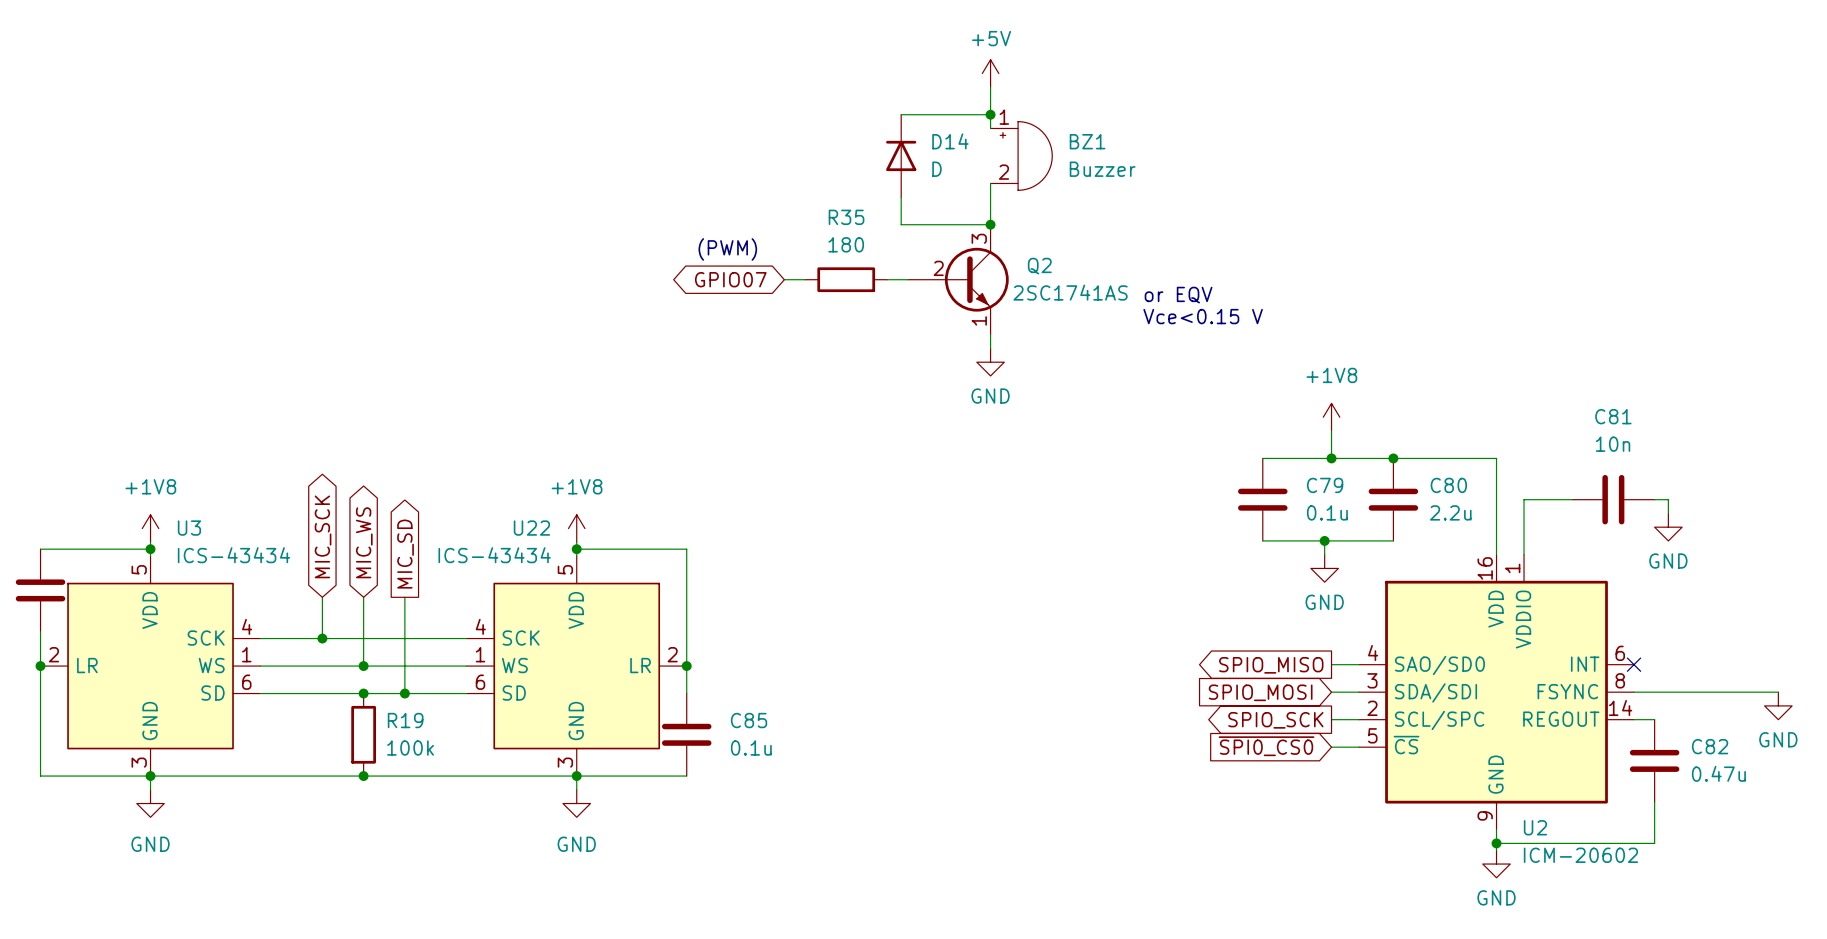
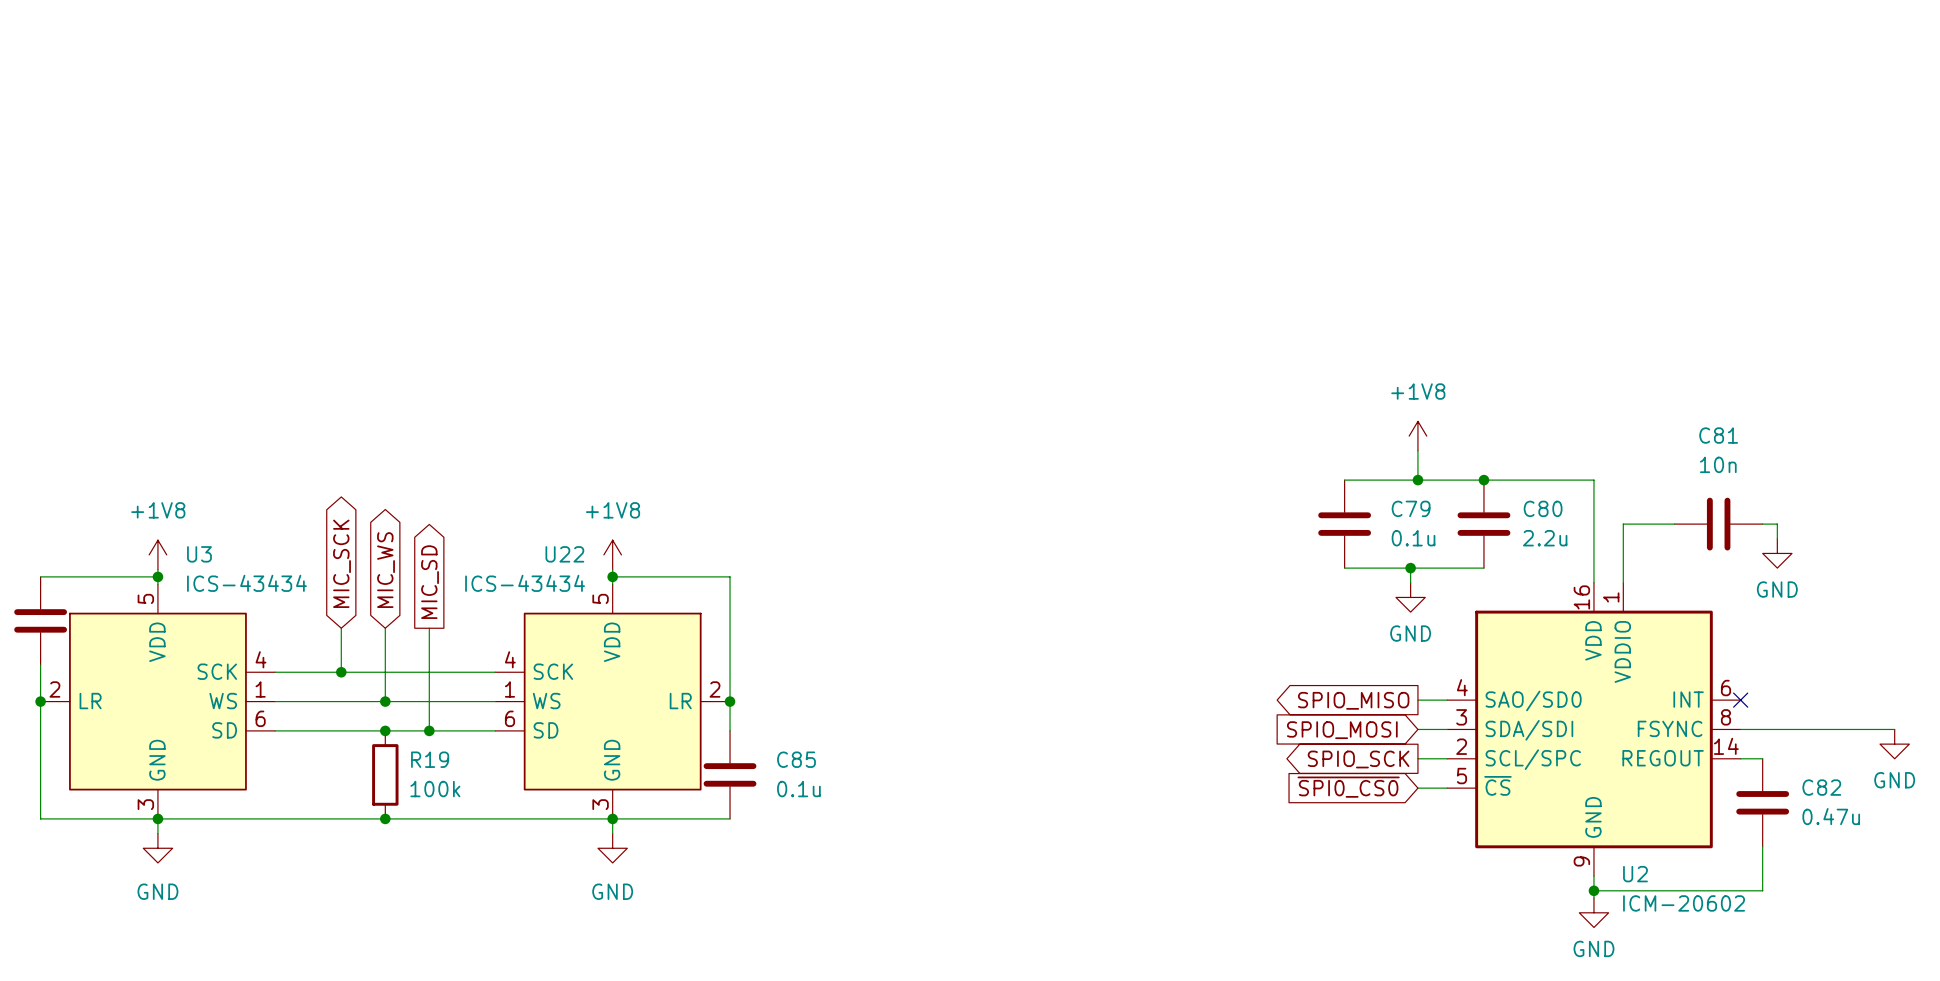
power symbol: +5V (990, 73) -> none
wire: (990, 87) (990, 128) -> none
wire: (901, 114) (990, 114) -> none
junction: (990, 114) -> none
D14: D (901, 155) -> none
BZ1: Buzzer (1021, 155) -> none
wire: (990, 183) (990, 224) (901, 224) (901, 197) -> none
junction: (990, 224) -> none
text: (PWM) (727, 249) -> none
global label: GPIO07 (730, 279) -> none
wire: (784, 279) (804, 279) -> none
R35: 180 (846, 279) -> none
wire: (887, 279) (908, 279) -> none
Q2: 2SC1741AS (958, 279) -> none
text: or EQV (1178, 295) -> none
text: Vce<0.15 V (1203, 316) -> none
wire: (990, 334) (990, 348) -> none
power symbol: GND (990, 362) -> none

